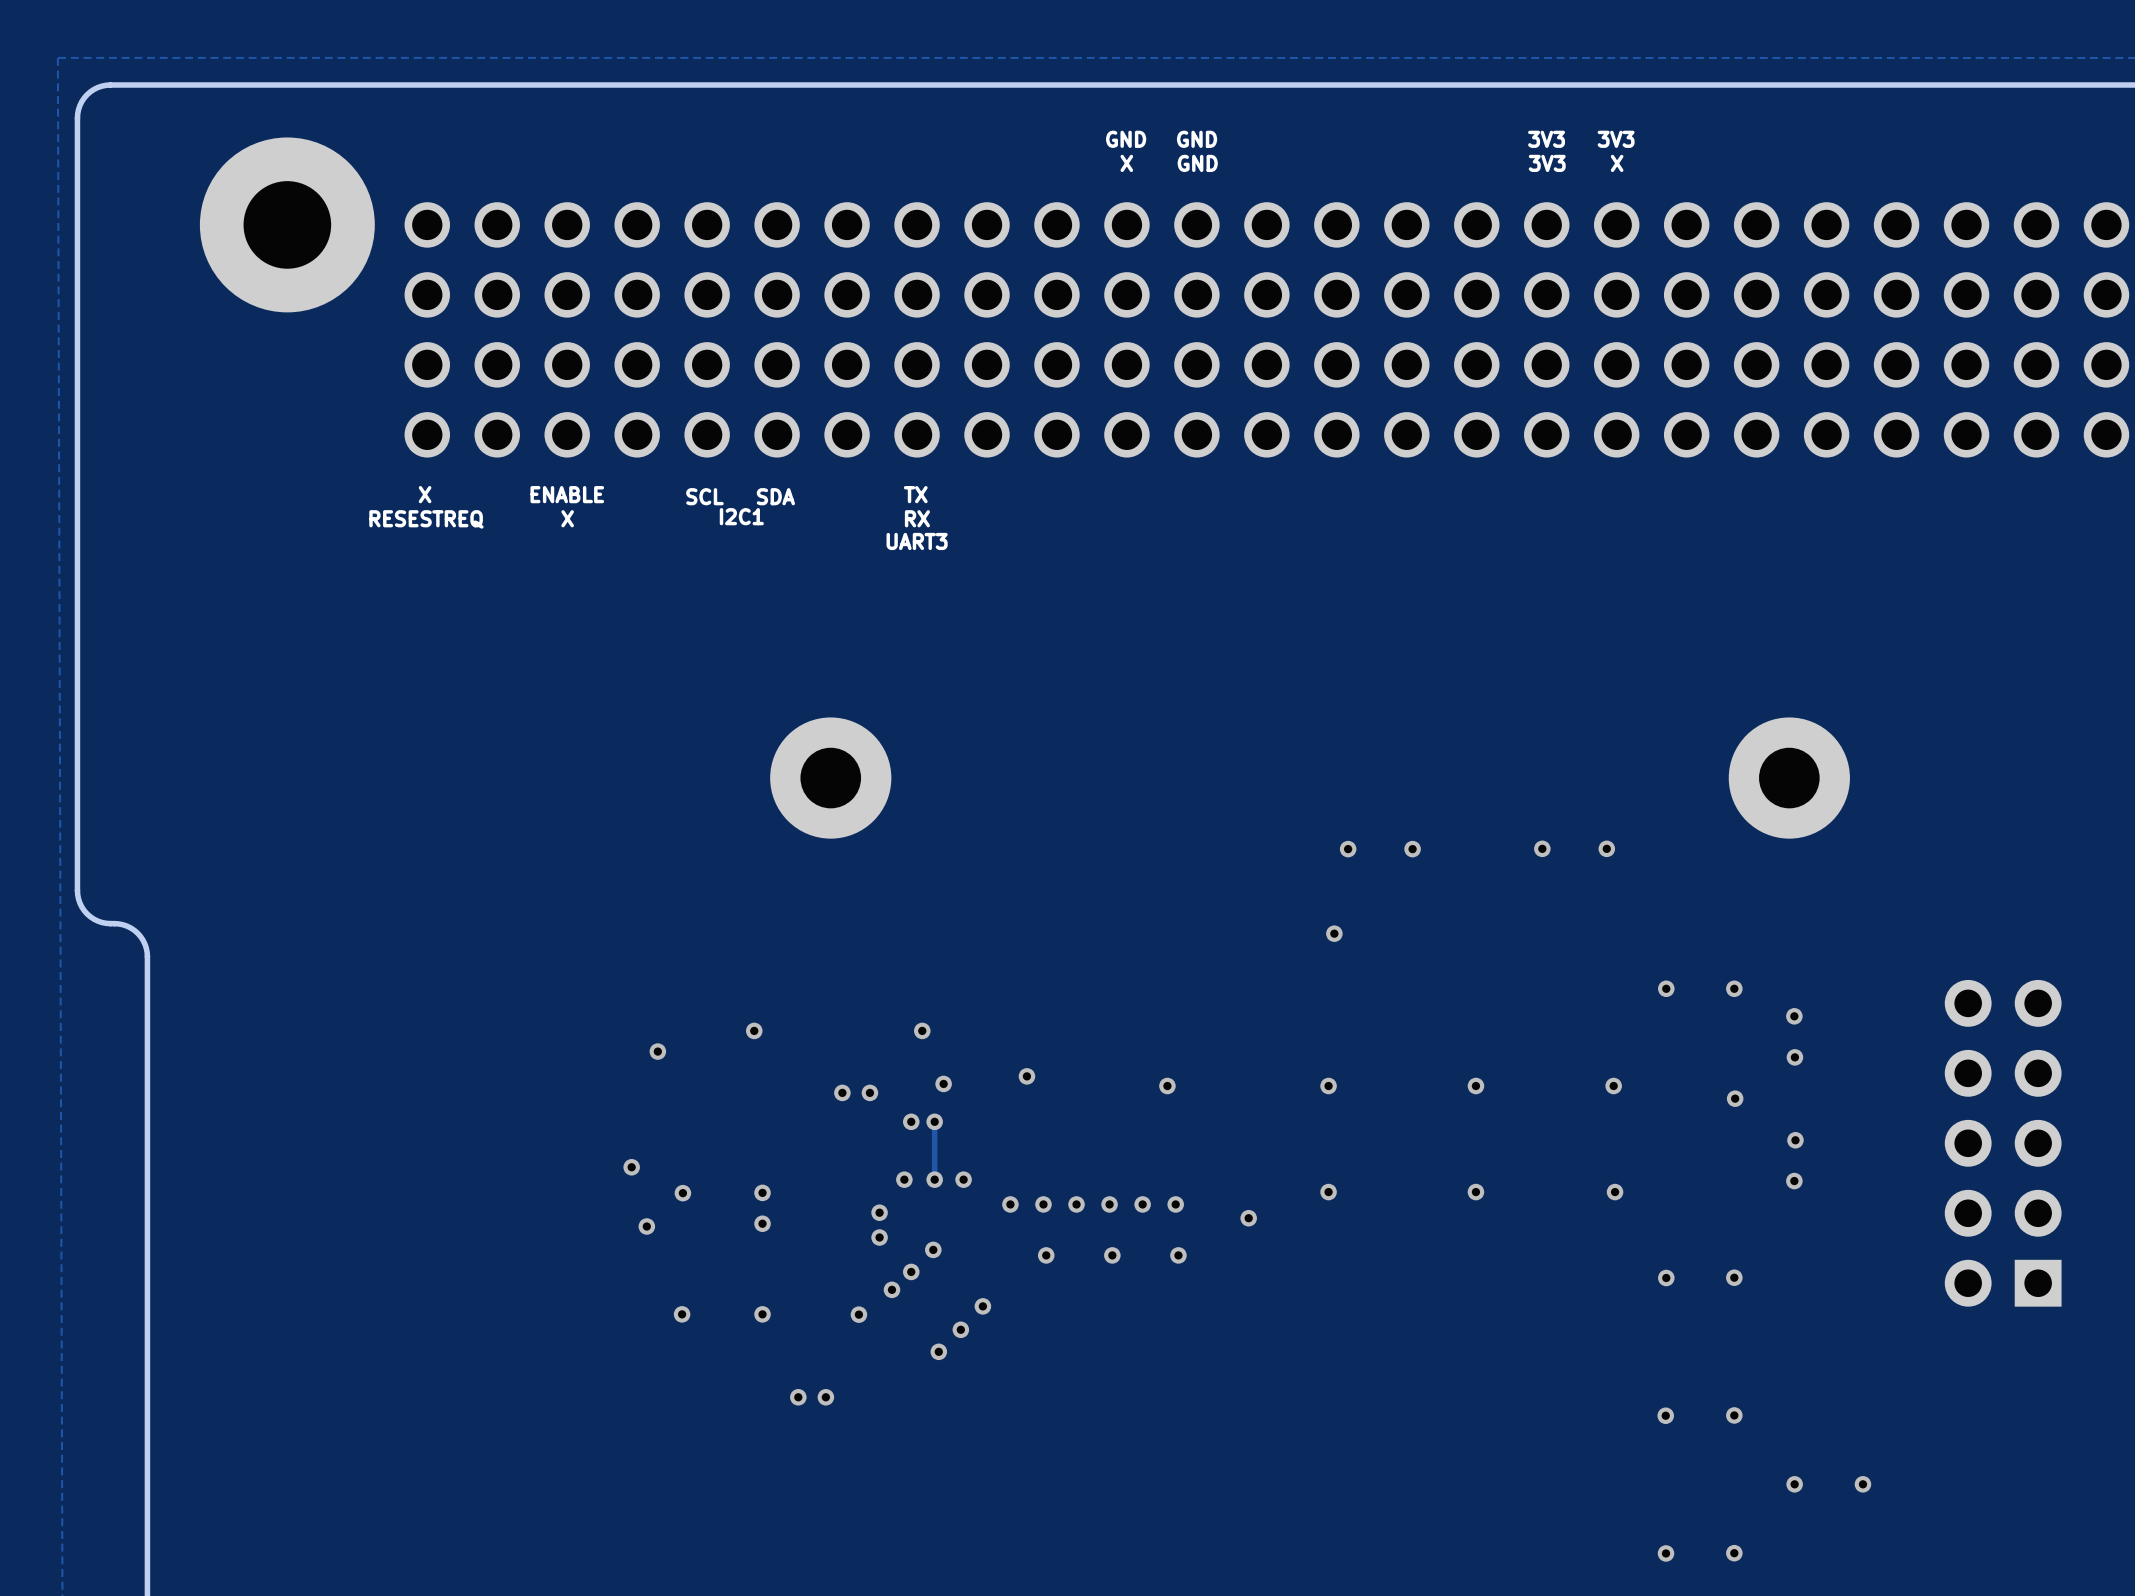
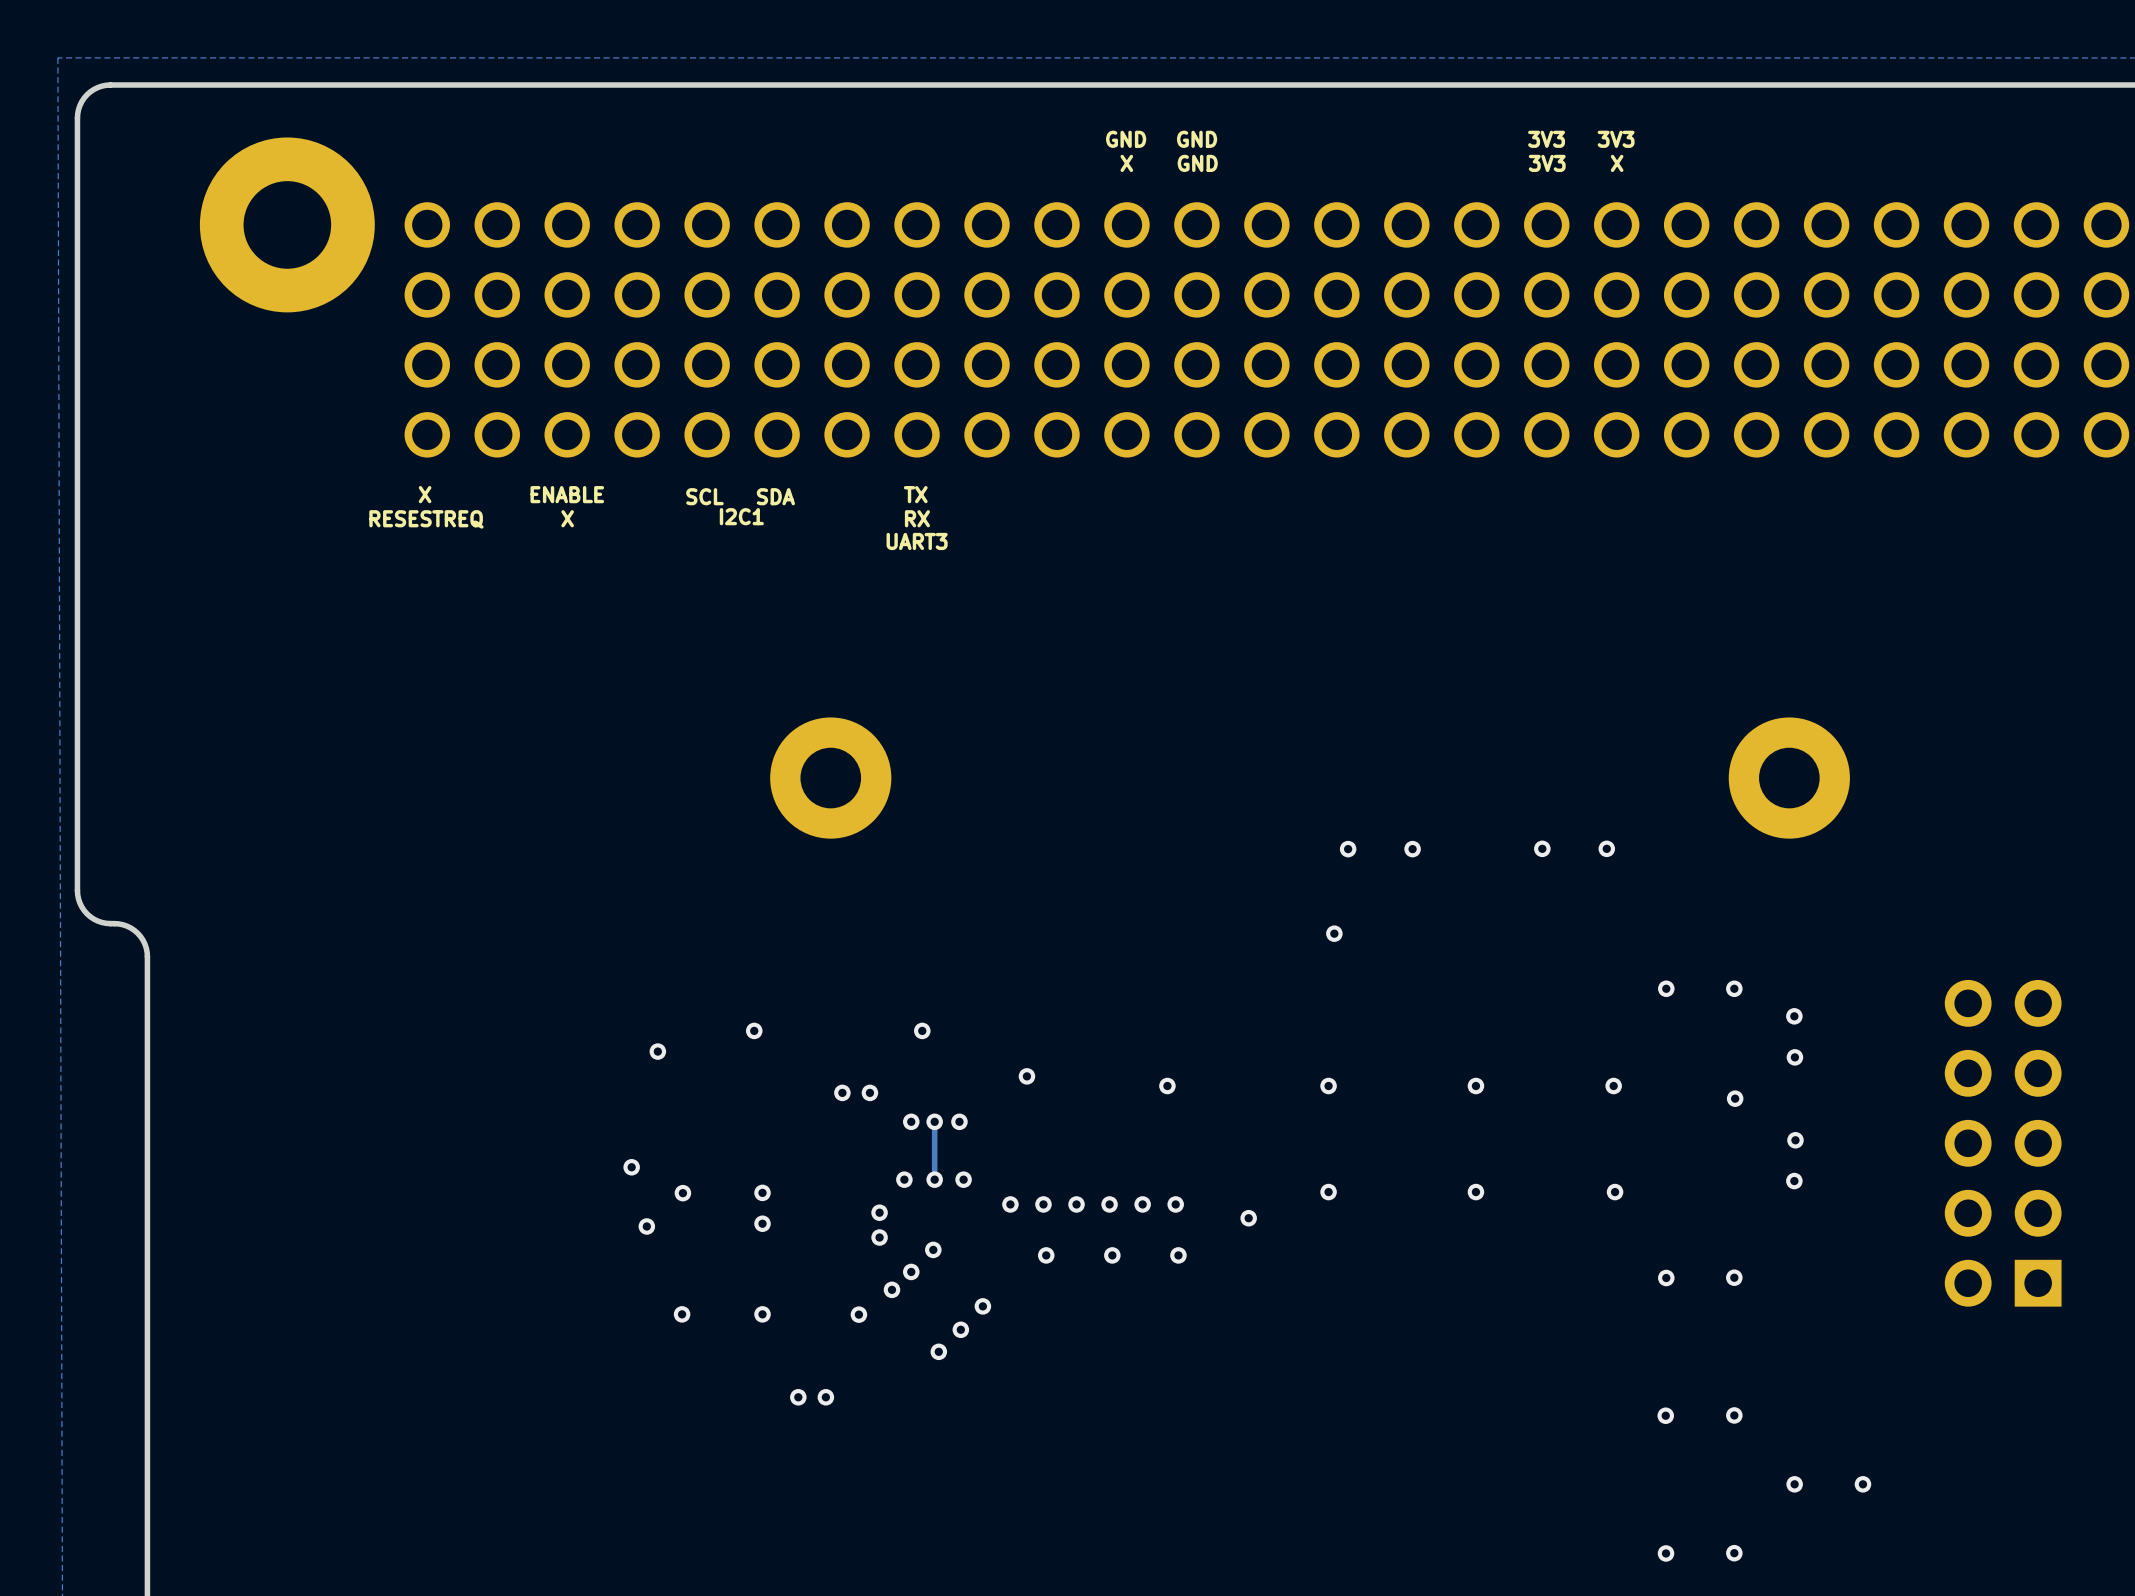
via position: (943, 1083) -> (959, 1121)

